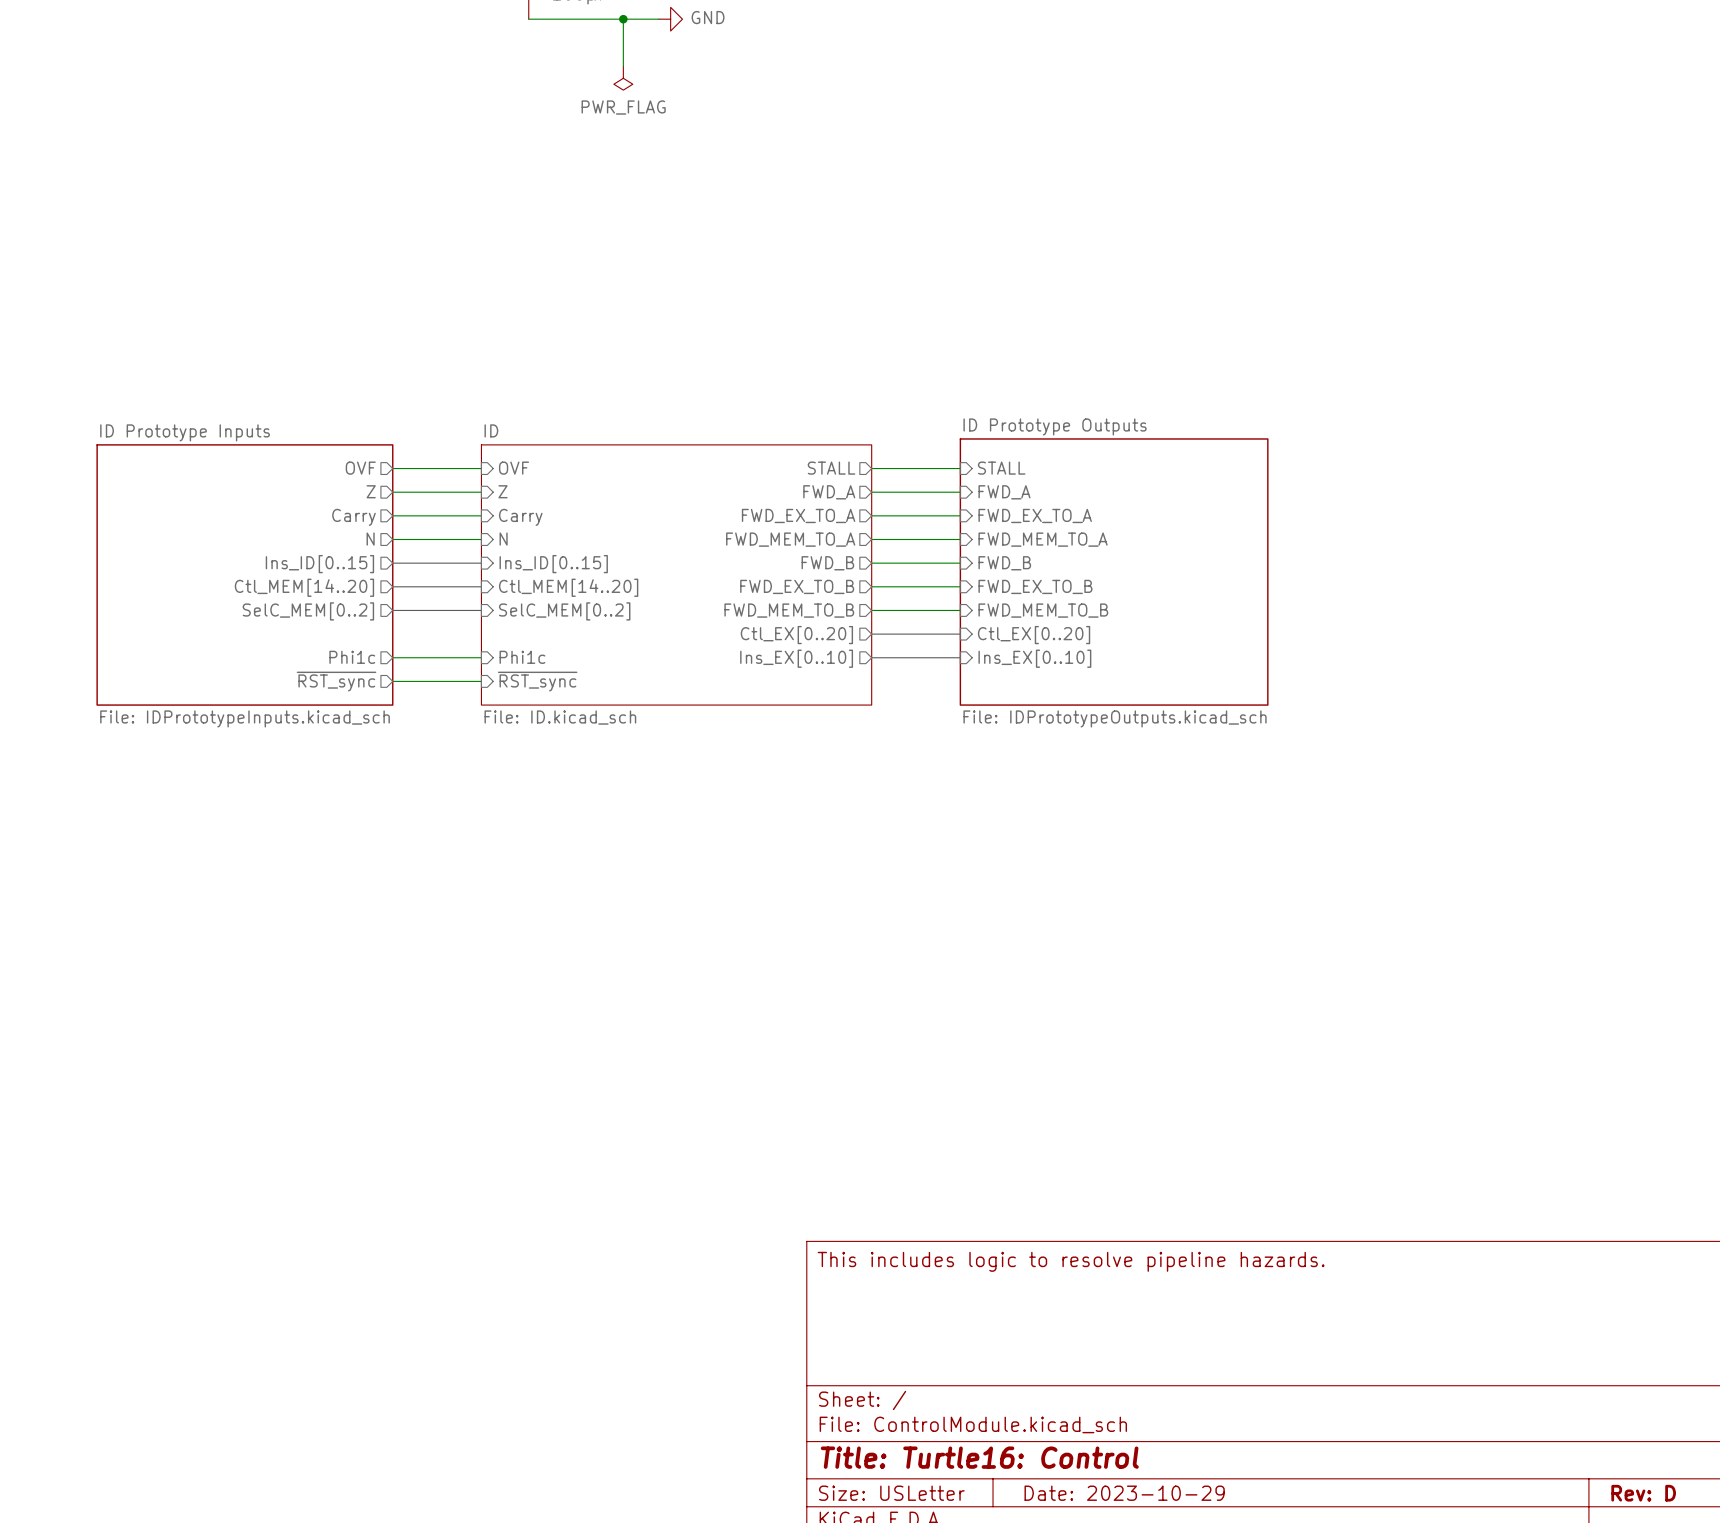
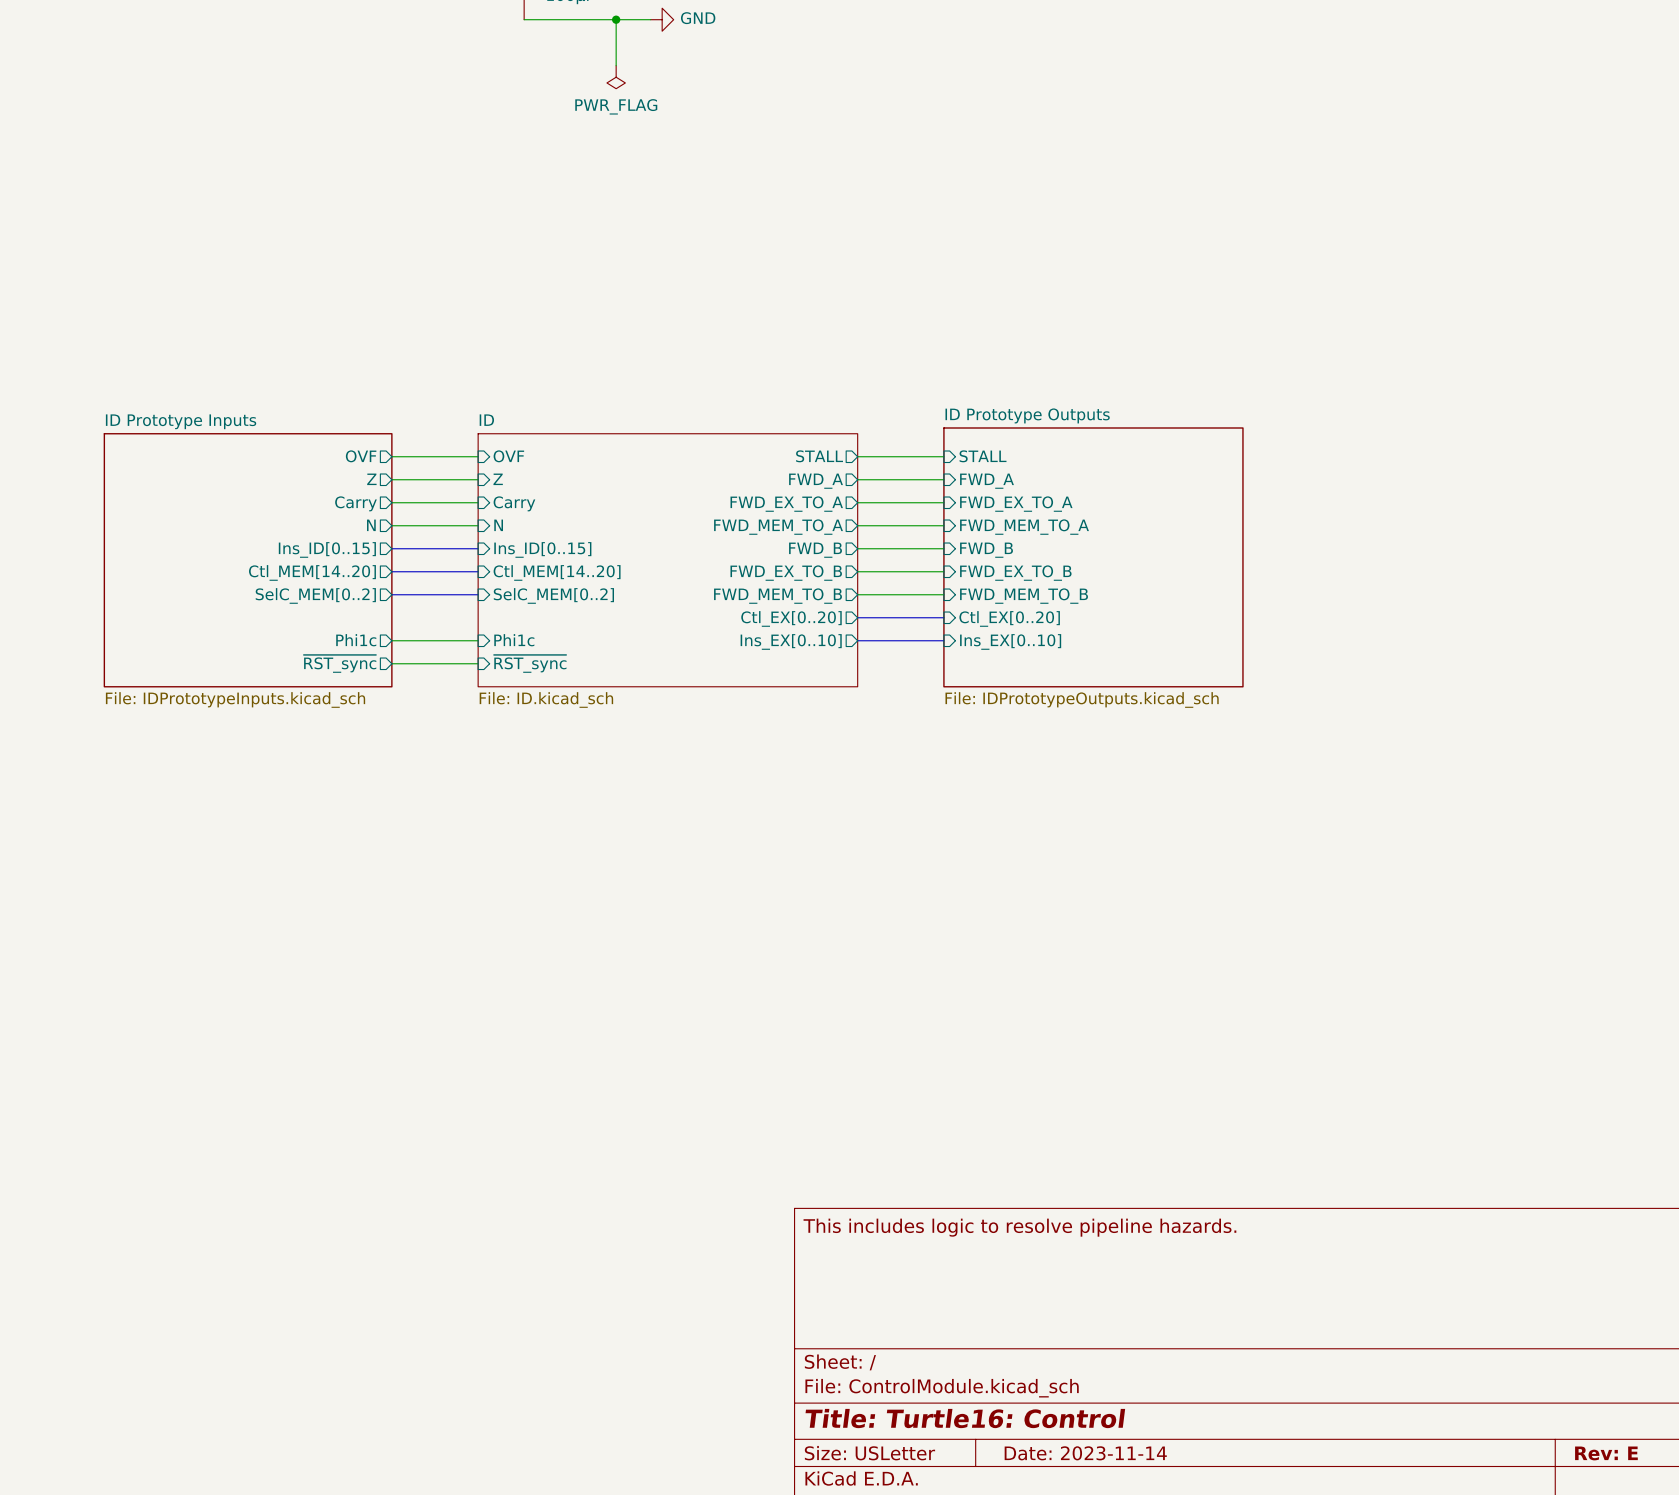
title block: Date: 2023-10-29 (1124, 1493) -> Date: 2023-11-14 (1085, 1453)
title block: Rev: D (1643, 1493) -> Rev: E (1606, 1453)

